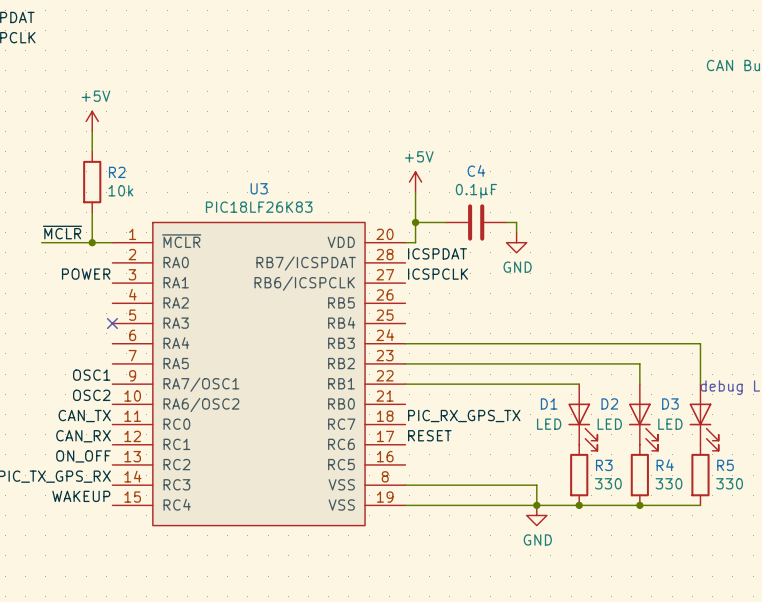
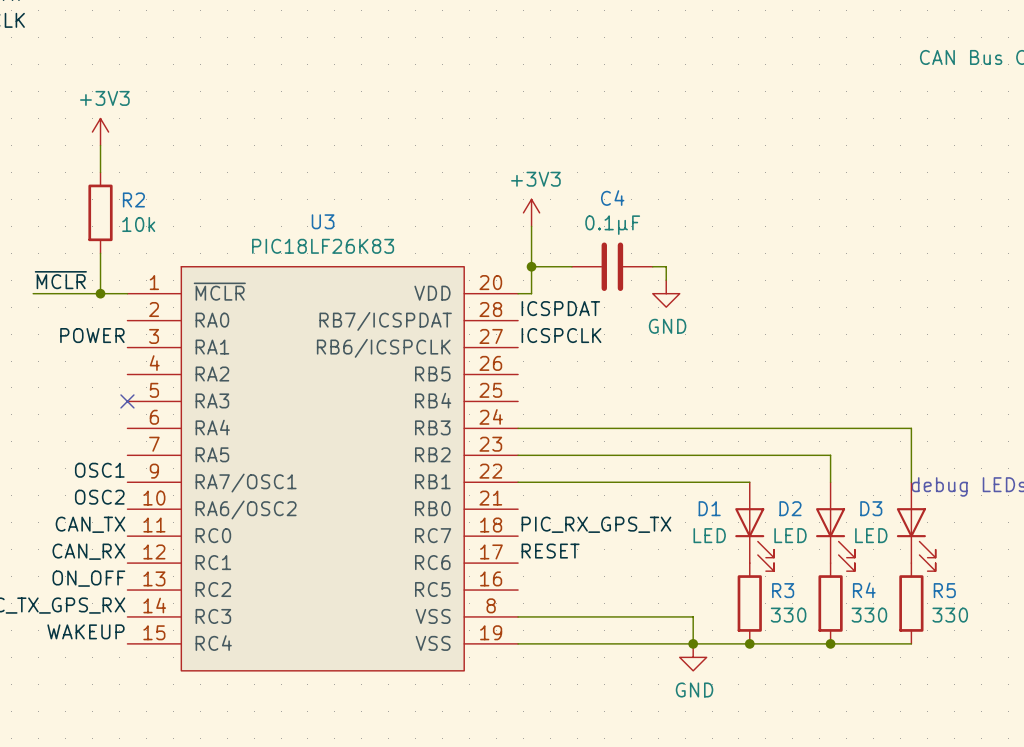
power symbol: +5V (92, 121) -> +3V3 (100, 132)
power symbol: +5V (415, 182) -> +3V3 (531, 212)

